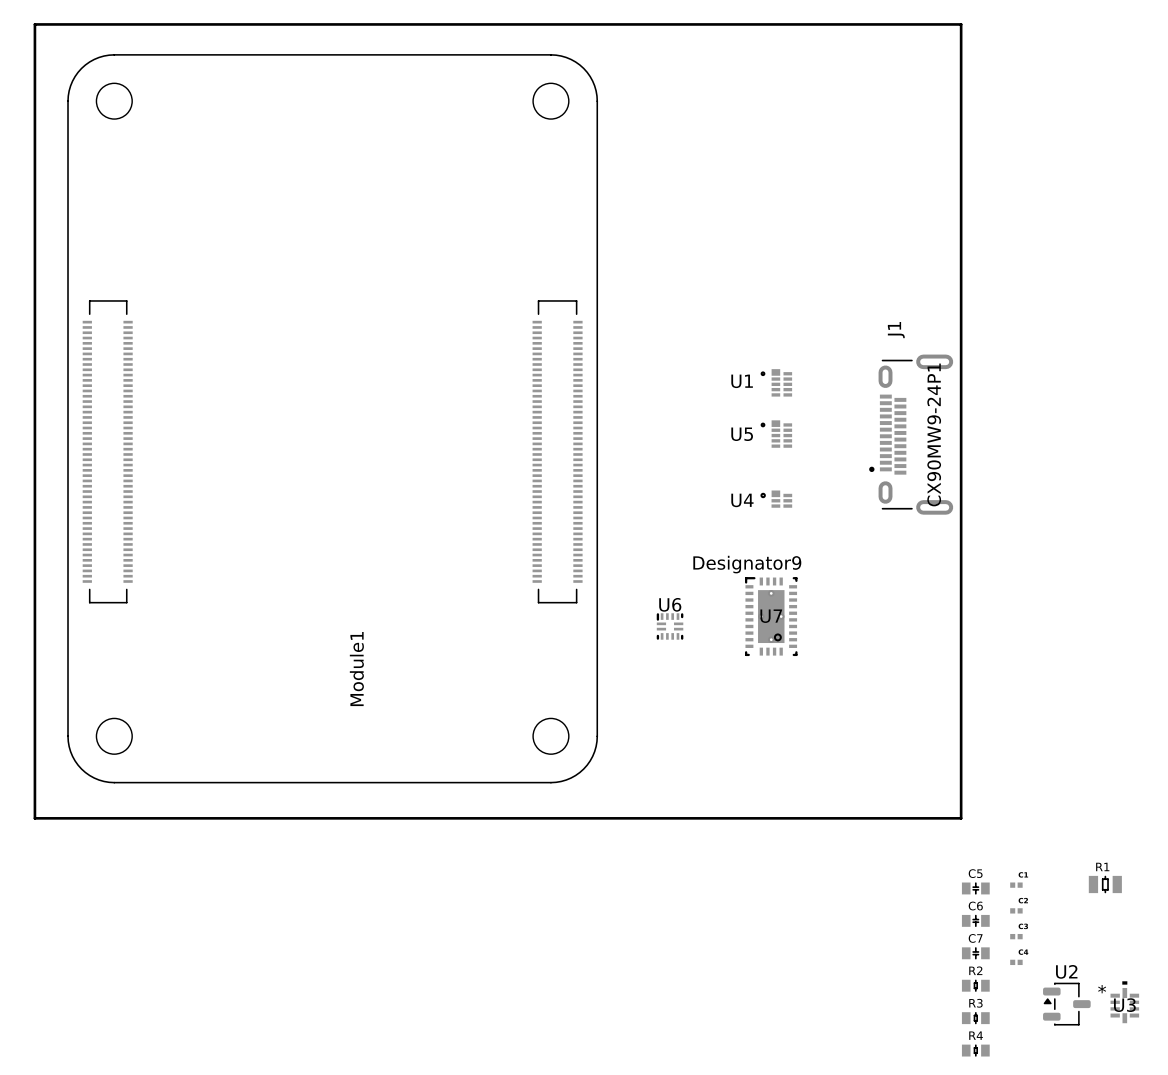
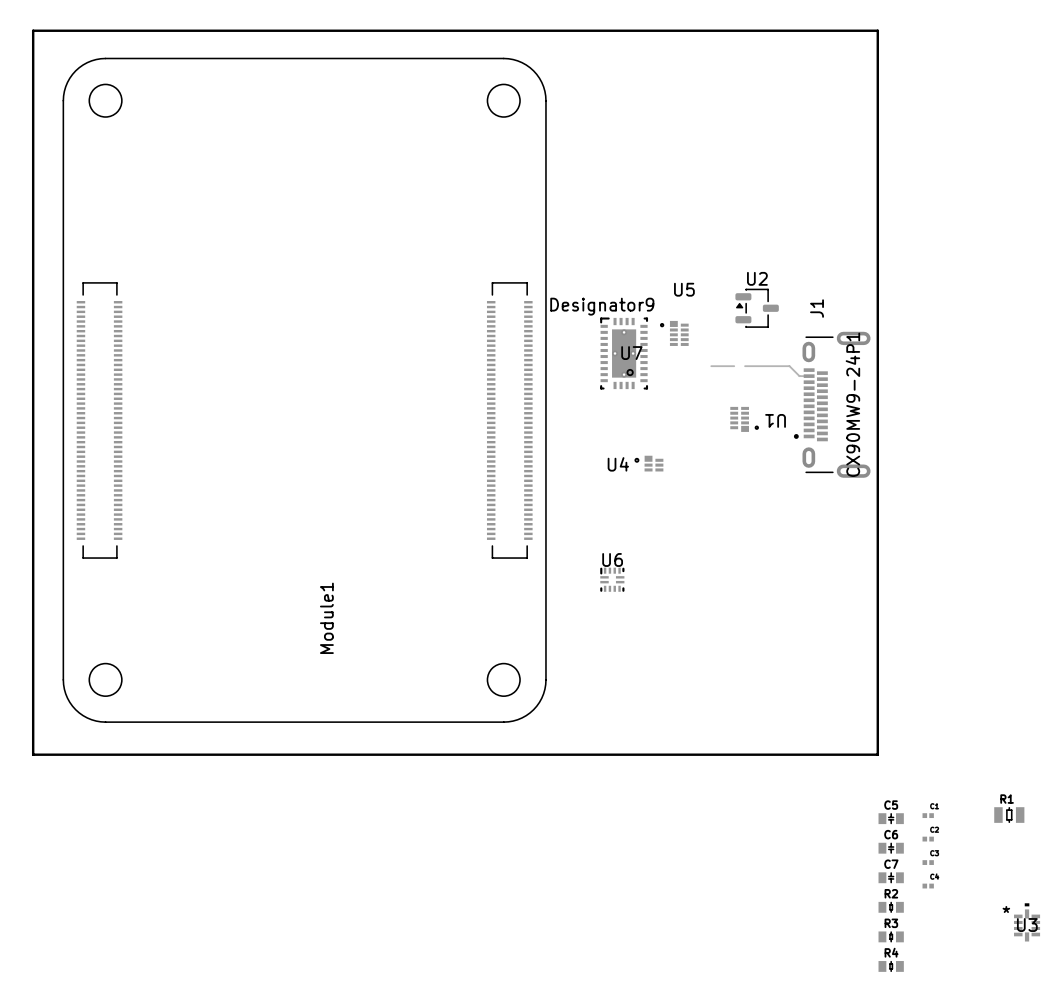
U1 rotation: 0° (776, 382) -> 180° (744, 419)
U1 position: (776, 382) -> (744, 419)
track: none -> (711, 366) (734, 366)
track: none -> (745, 366) (789, 366) (799, 376) (809, 376)
U5 name position: U5 (742, 434) -> U5 (684, 289)
U5 position: (776, 434) -> (674, 333)
U4 position: (776, 499) -> (648, 463)
U7 position: (771, 616) -> (624, 353)
U7 name position: U7 (771, 616) -> U7 (631, 353)
U2 position: (1066, 1004) -> (757, 308)

